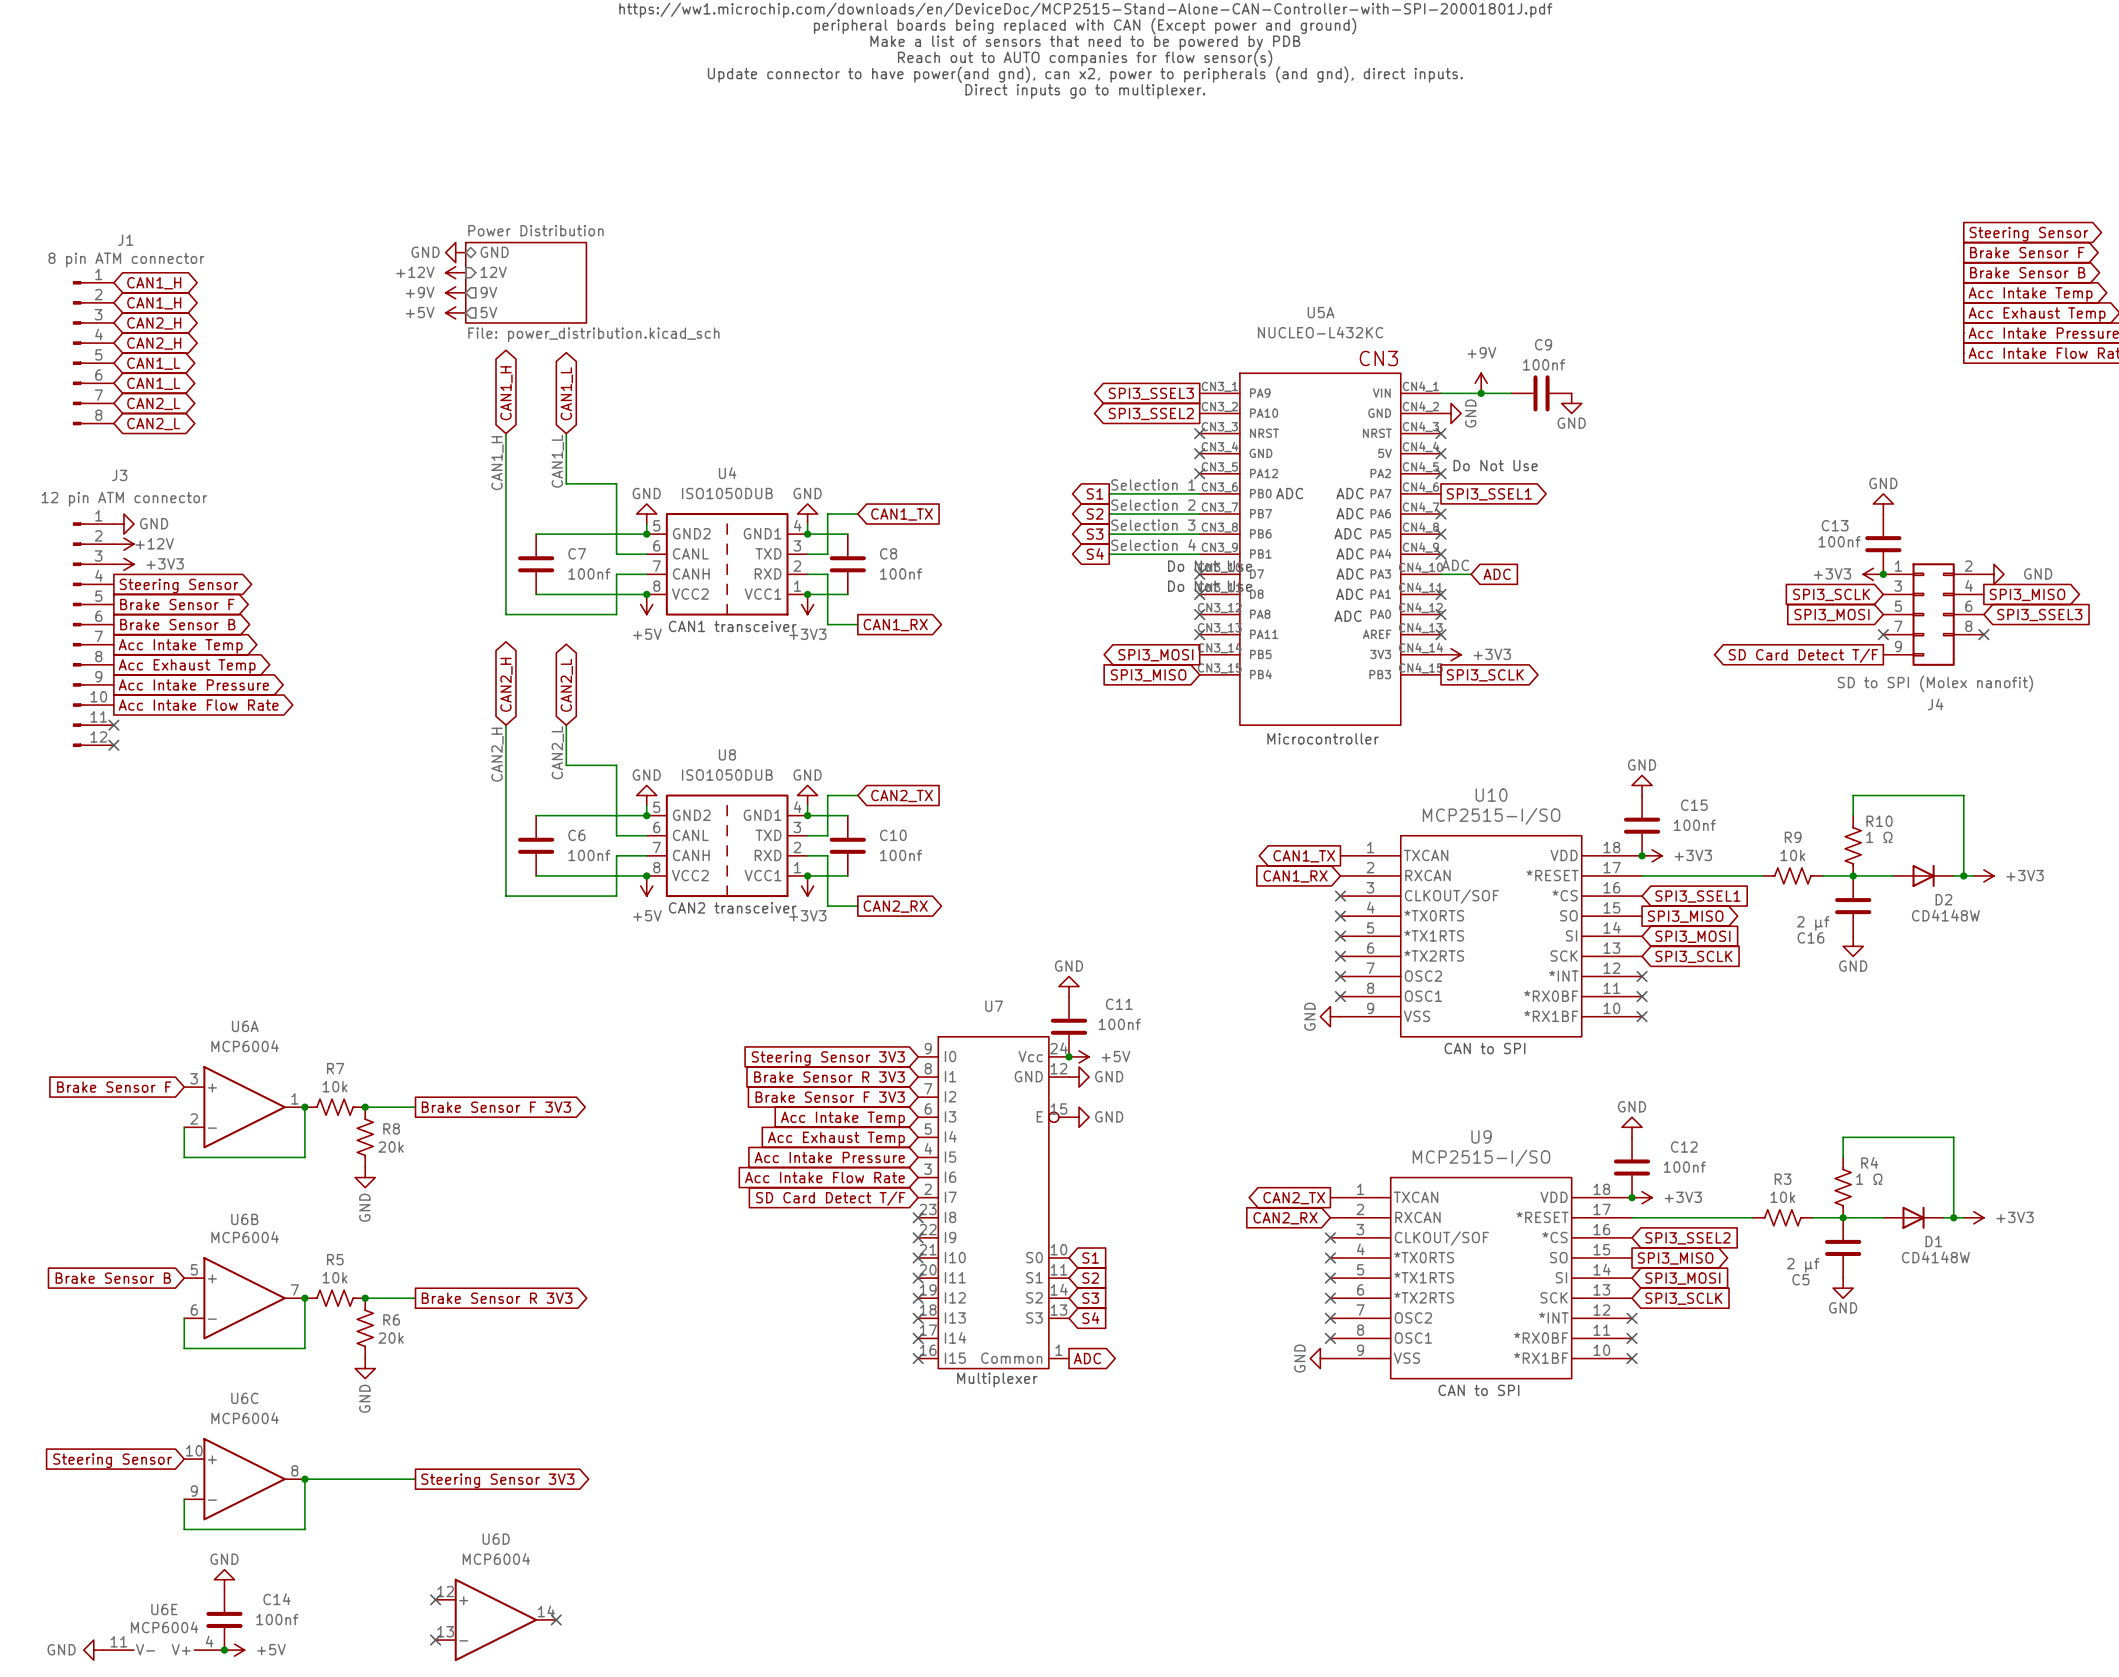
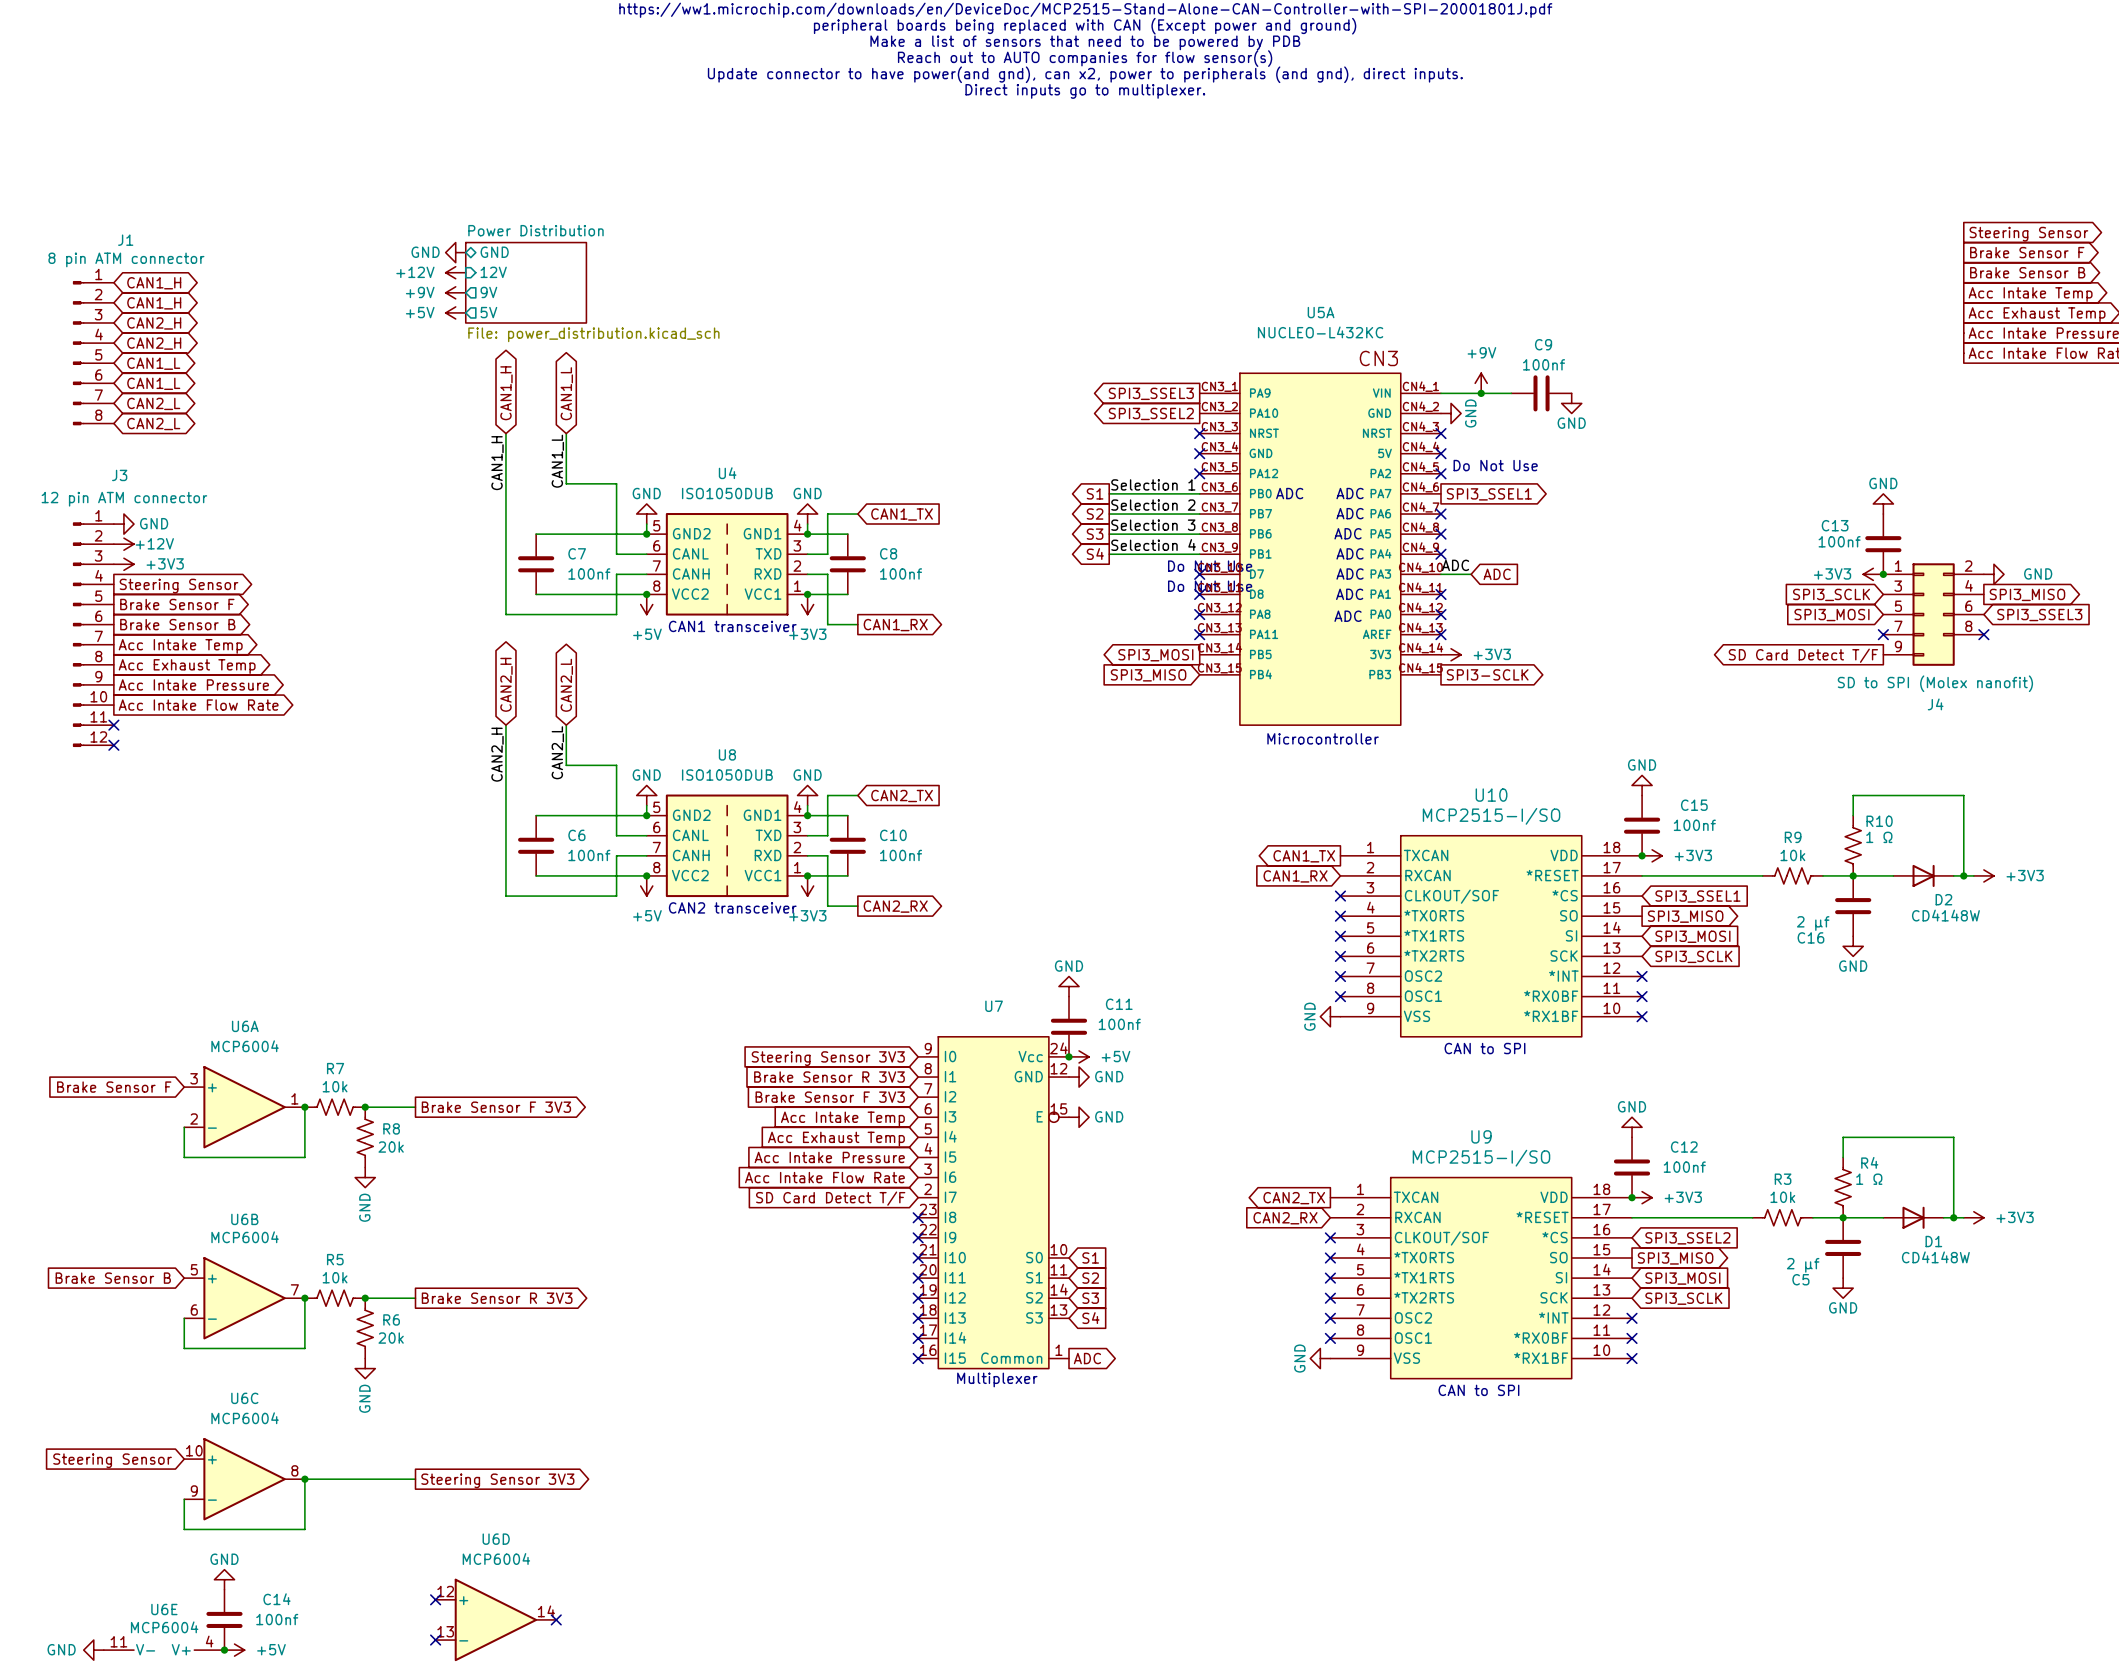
global label: SPI3_SCLK (1485, 675) -> SPI3-SCLK (1487, 674)

